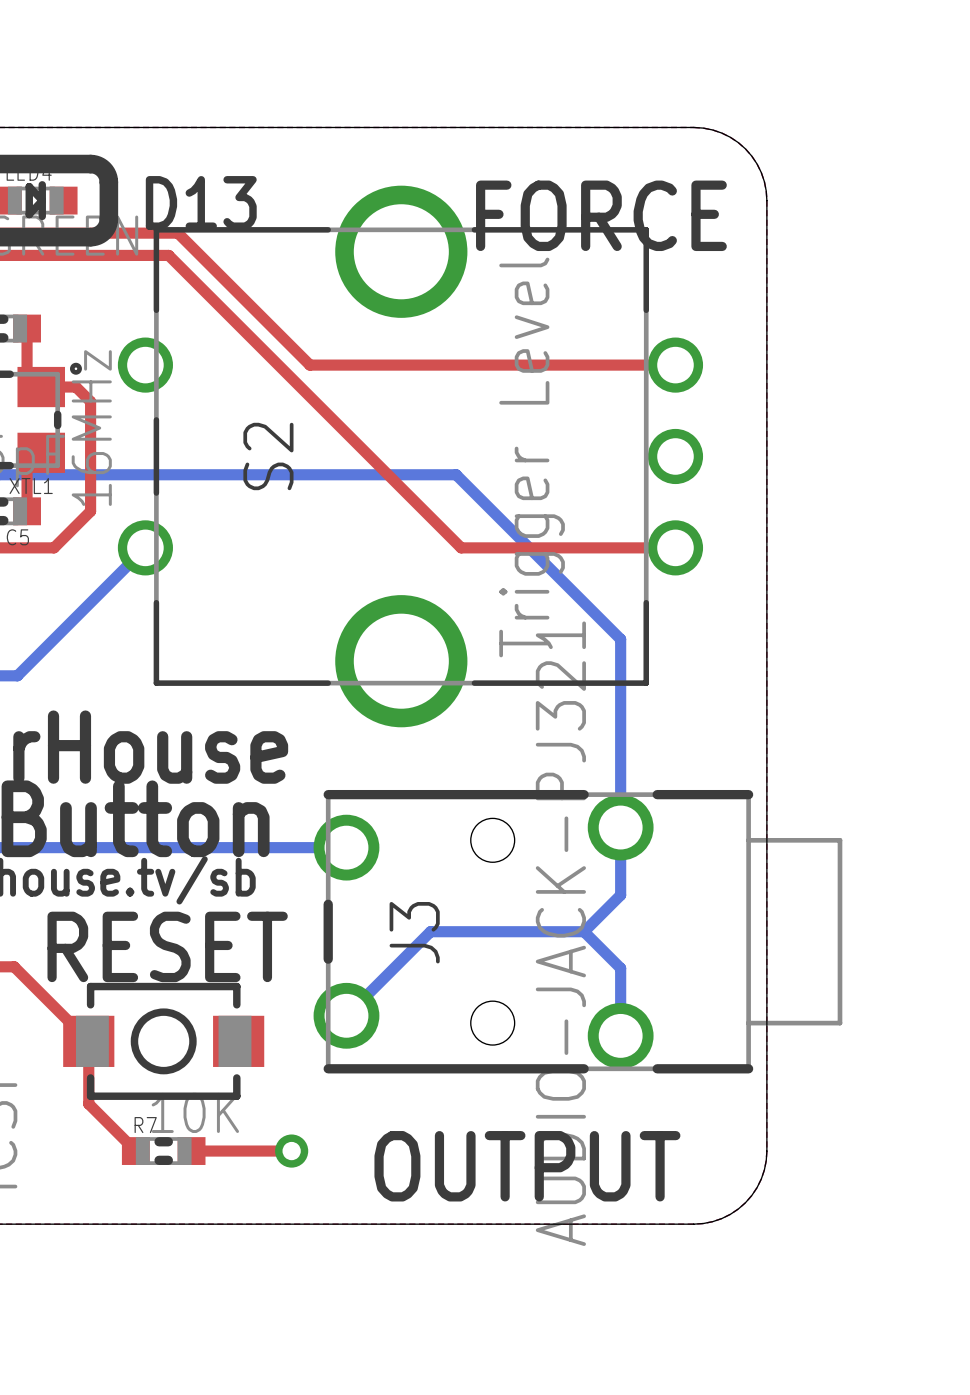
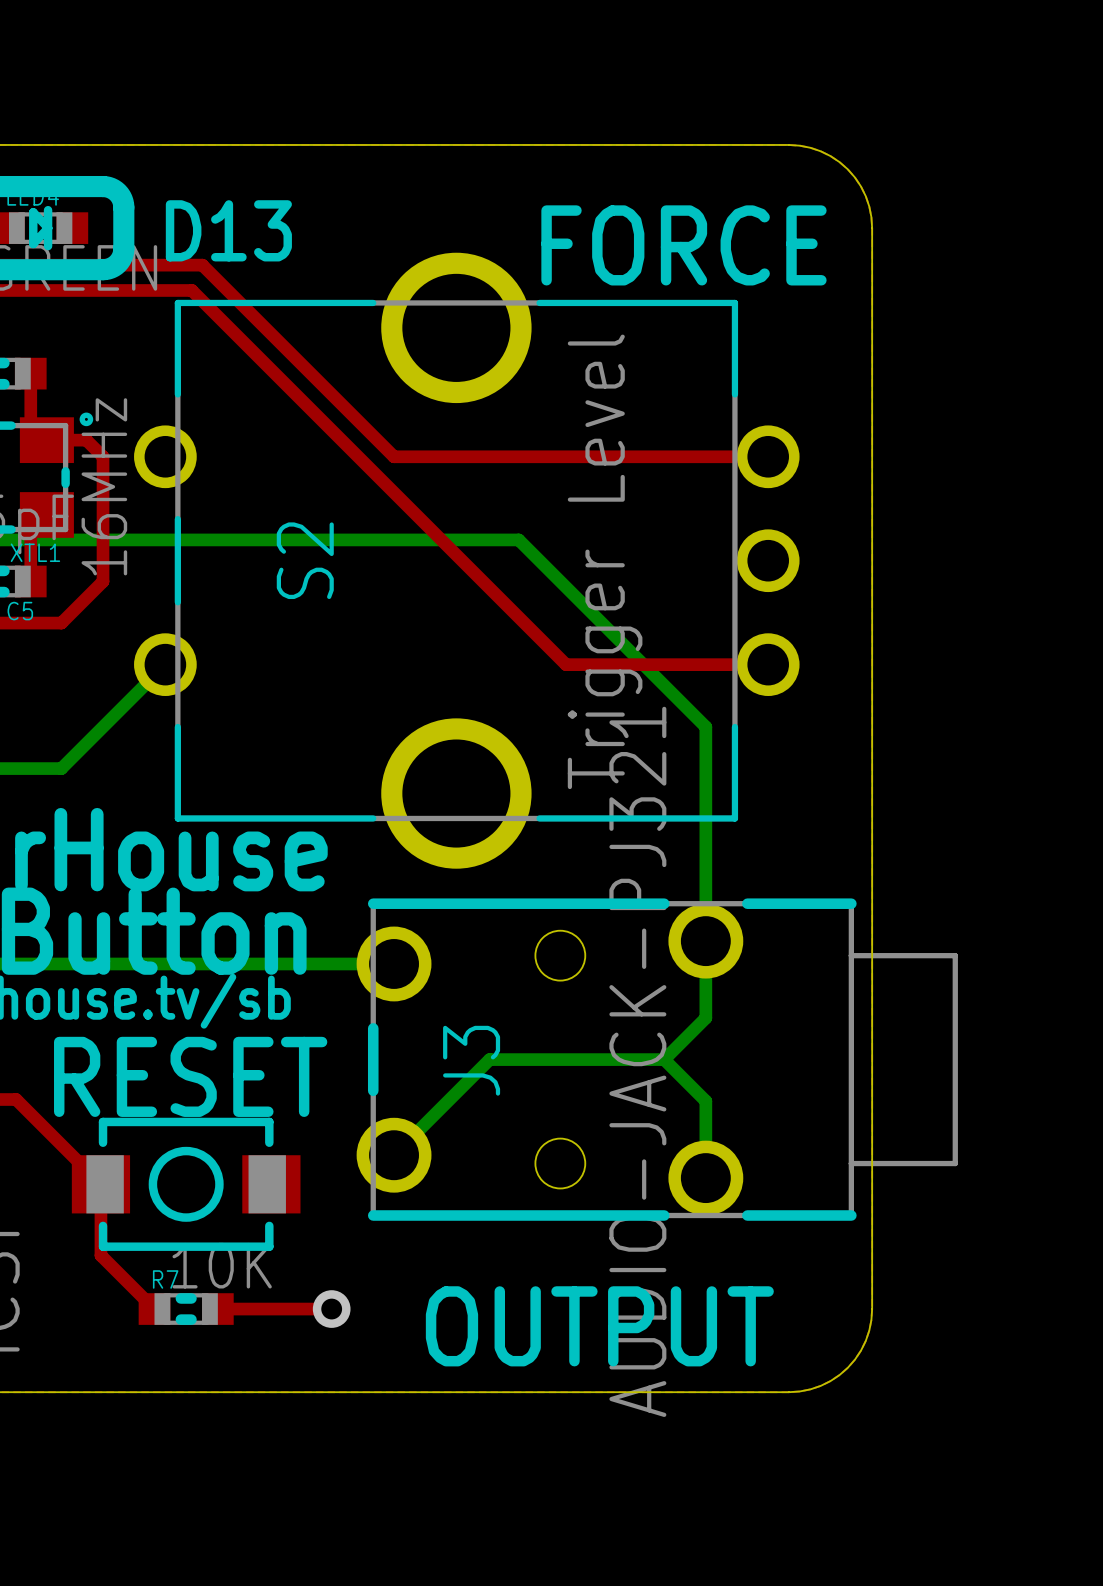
top track: (309, 365) (675, 365) -> (352, 415) (394, 456) (768, 456)
S2 position: (410, 456) -> (466, 560)
bottom track: (145, 547) (17, 675) -> (165, 664) (61, 768) (19, 768)
top track: (461, 547) (675, 547) -> (524, 623) (566, 664) (768, 664)

